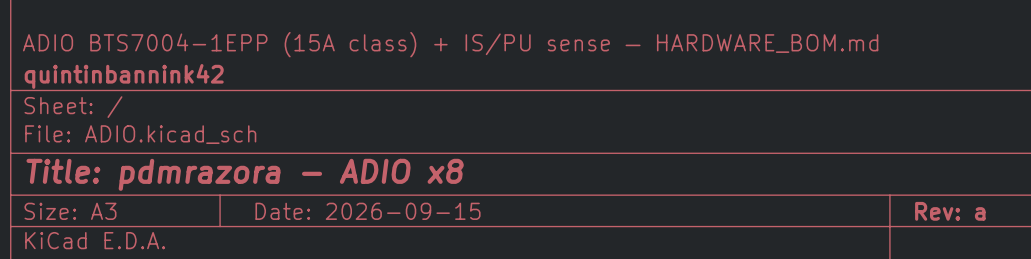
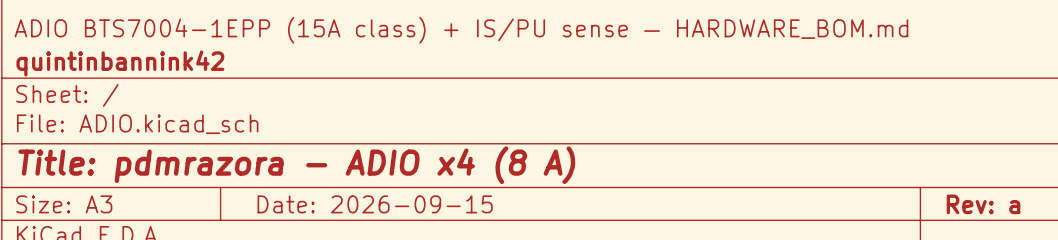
title block: Title: pdmrazora - ADIO x8 (245, 174) -> Title: pdmrazora - ADIO x4 (8 A) (296, 165)

